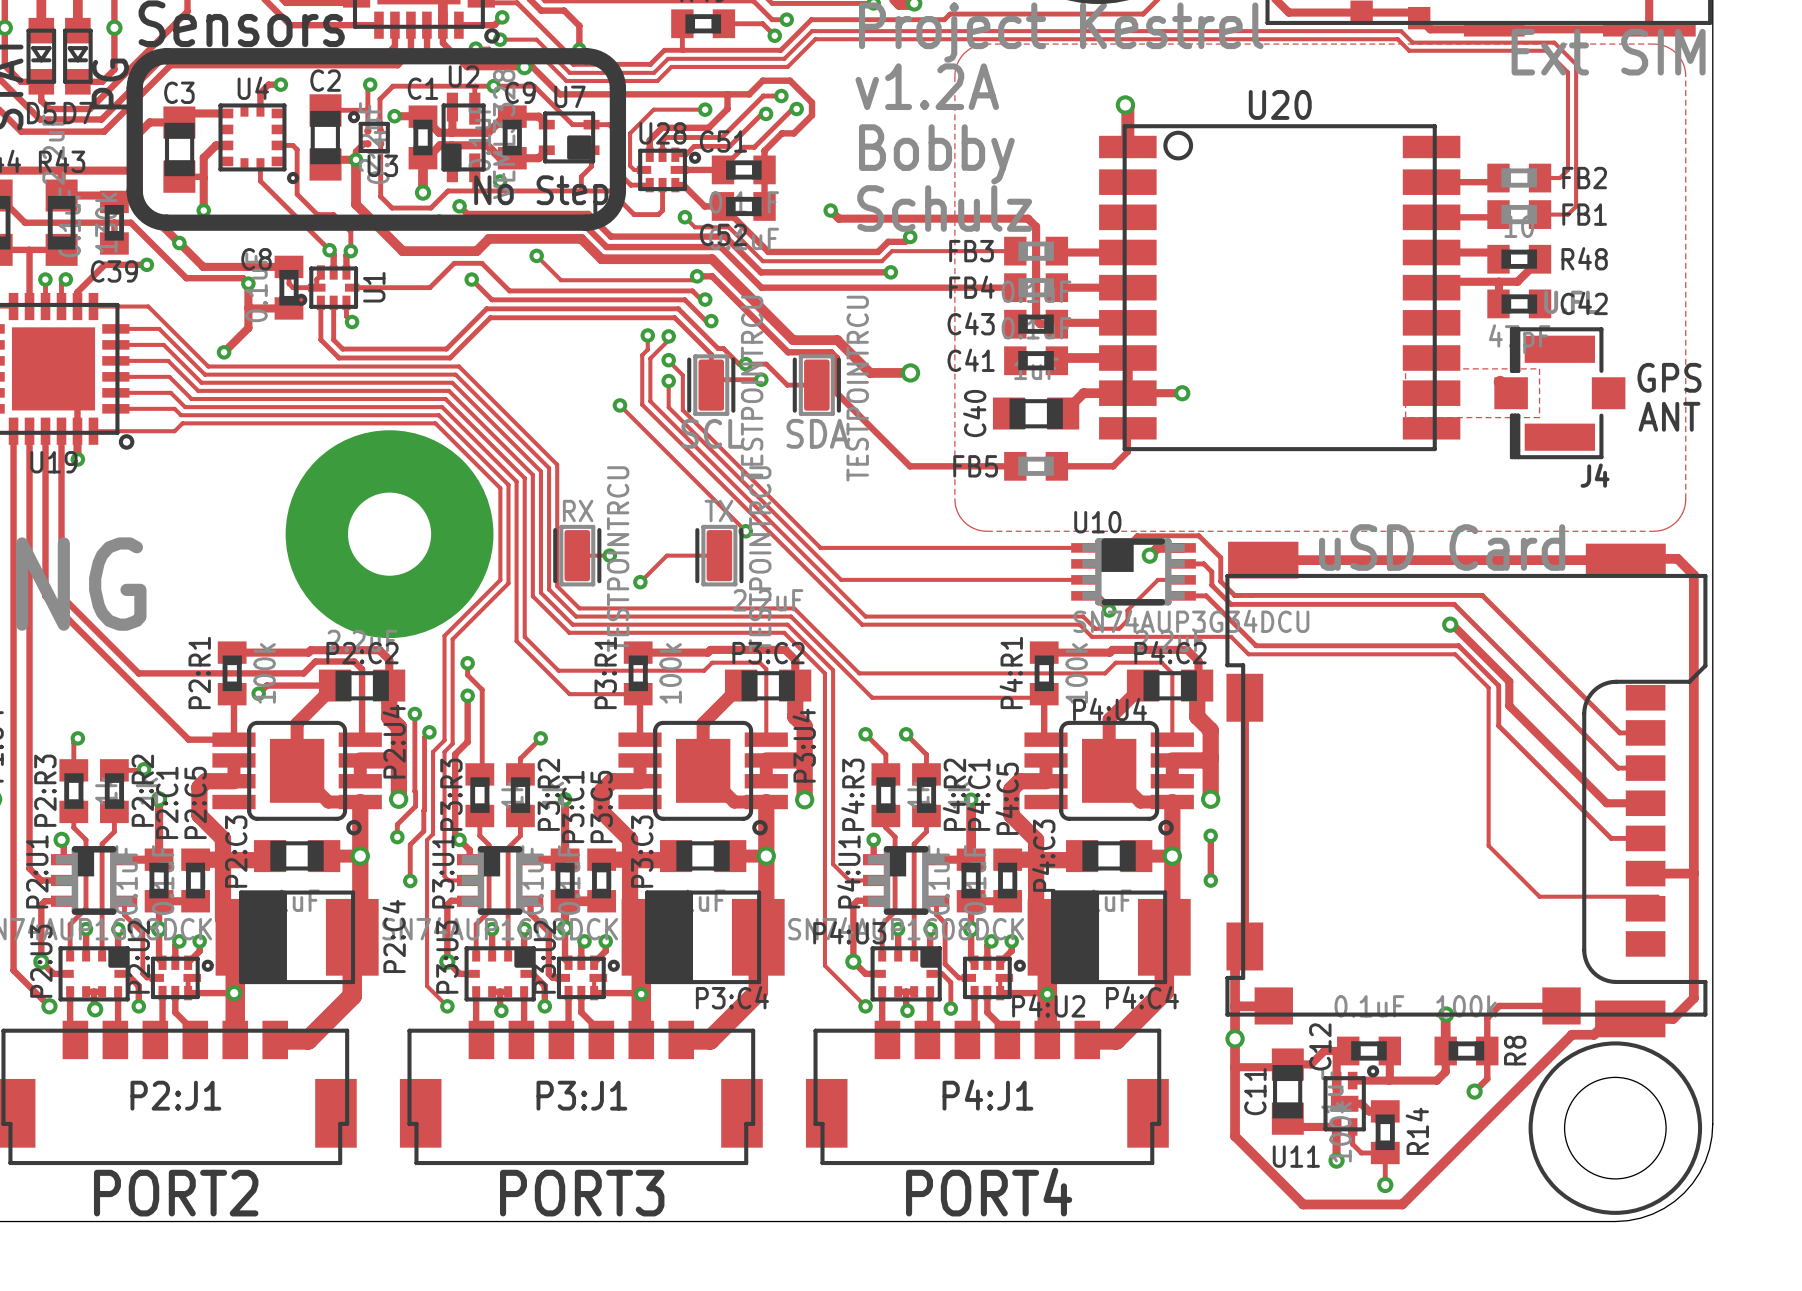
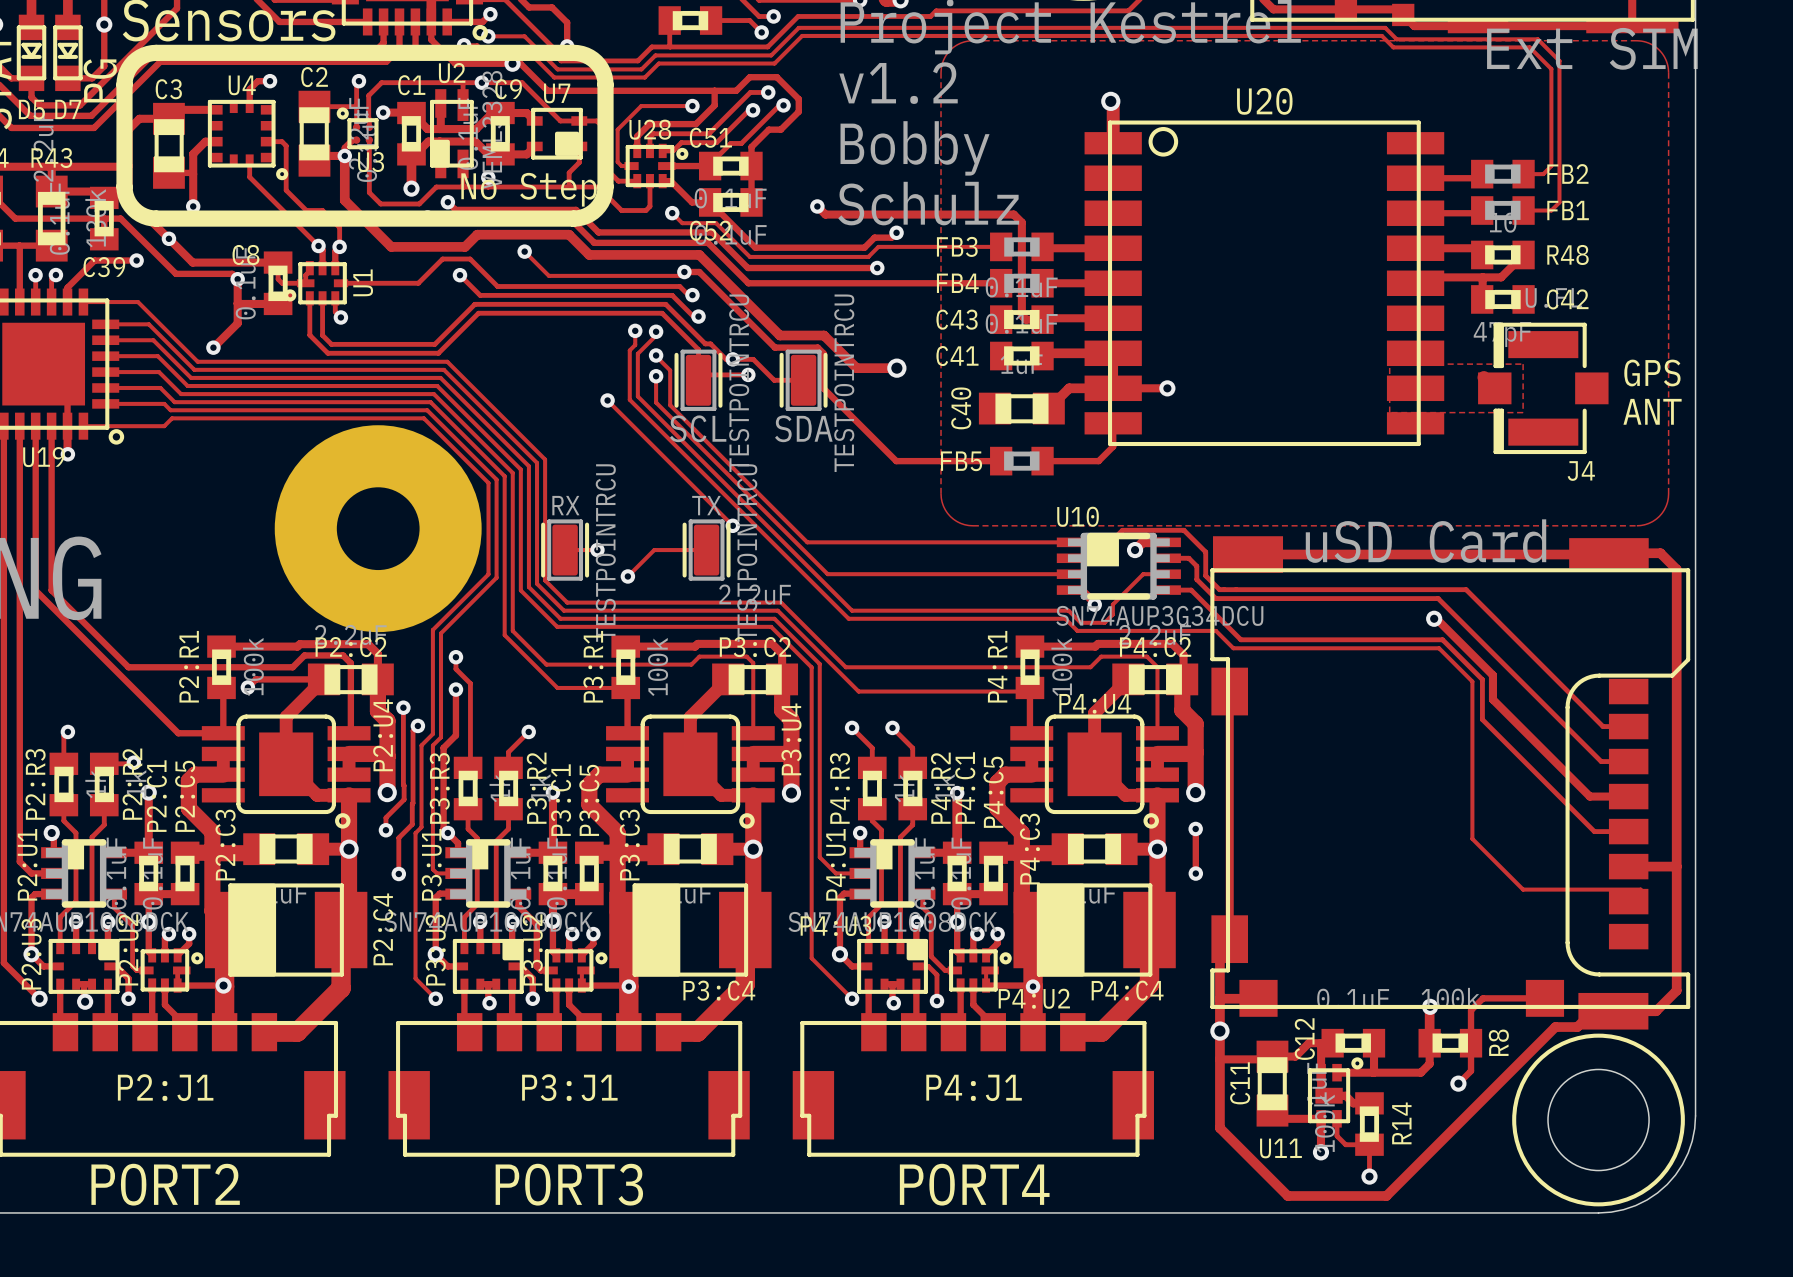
text: v1.2A (927, 86) -> v1.2 (898, 83)

